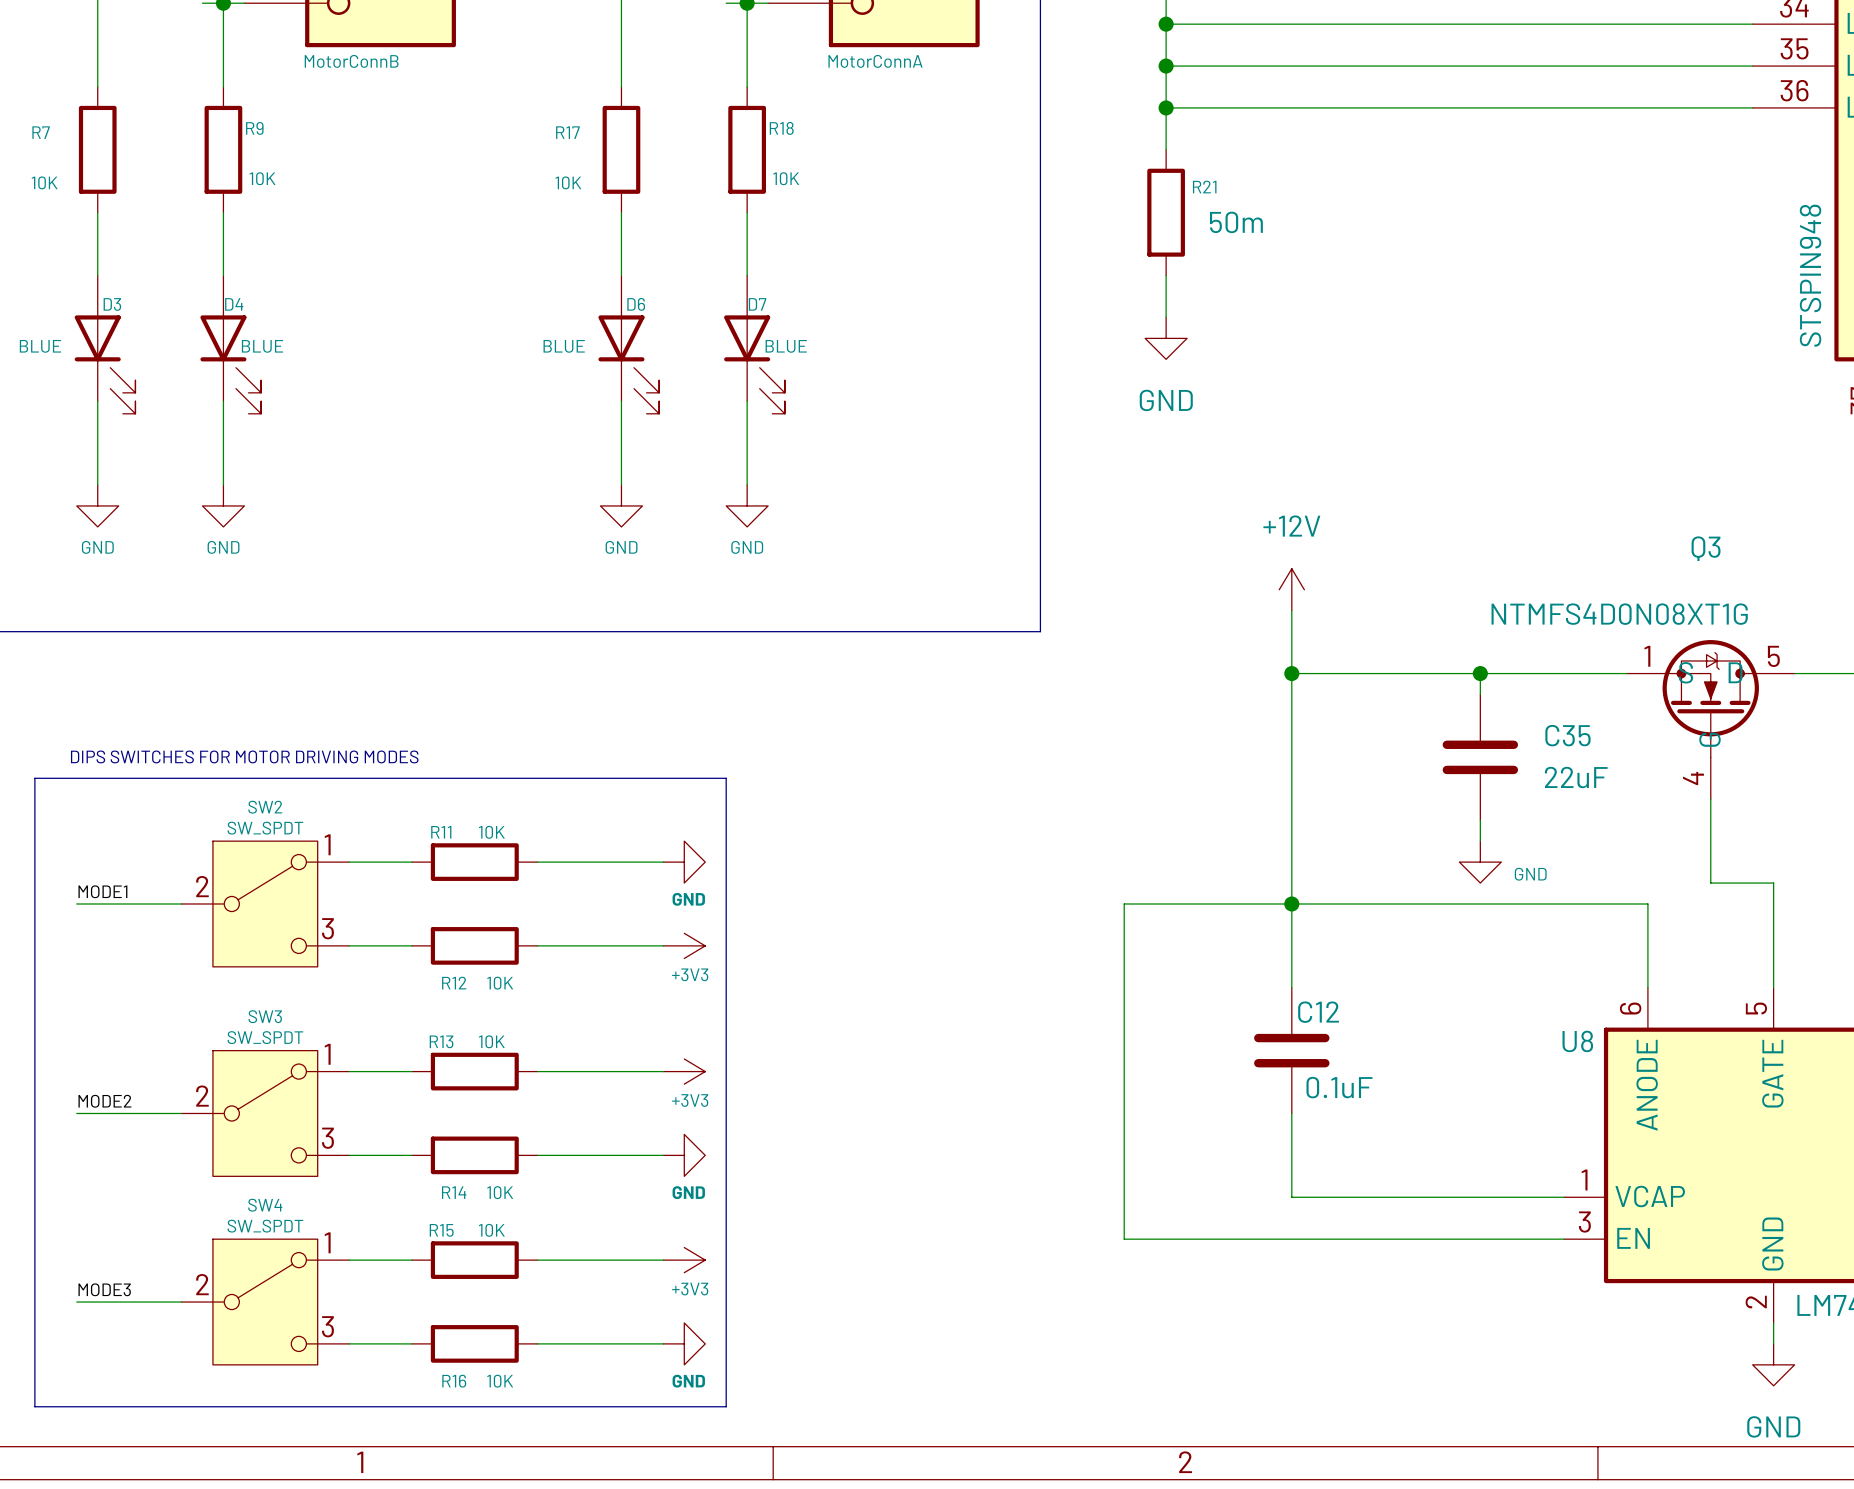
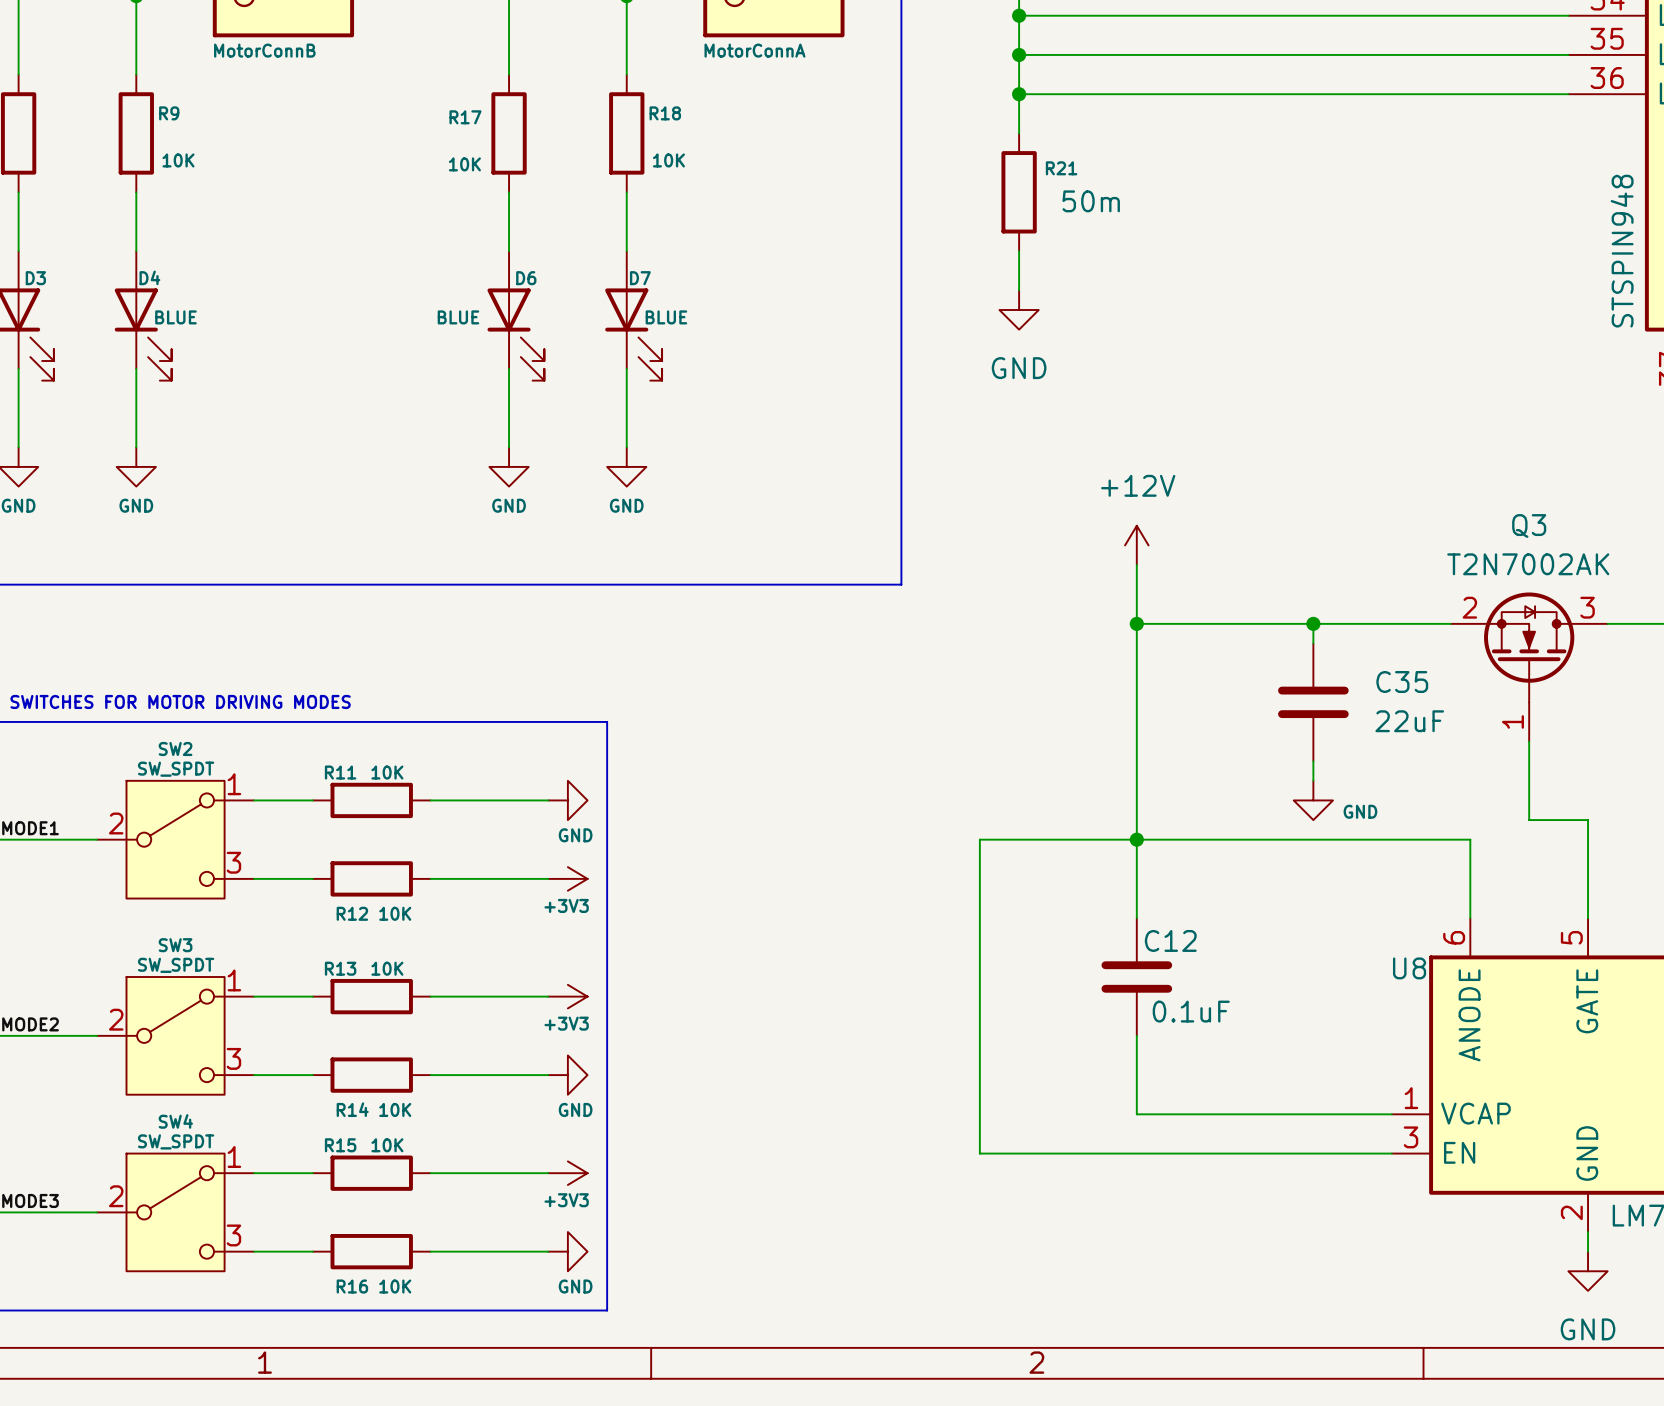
Q3 value: NTMFS4D0N08XT1G (1619, 614) -> T2N7002AK (1528, 564)
Q3 symbol: [1626, 640, 1795, 800] -> [1450, 592, 1608, 742]

